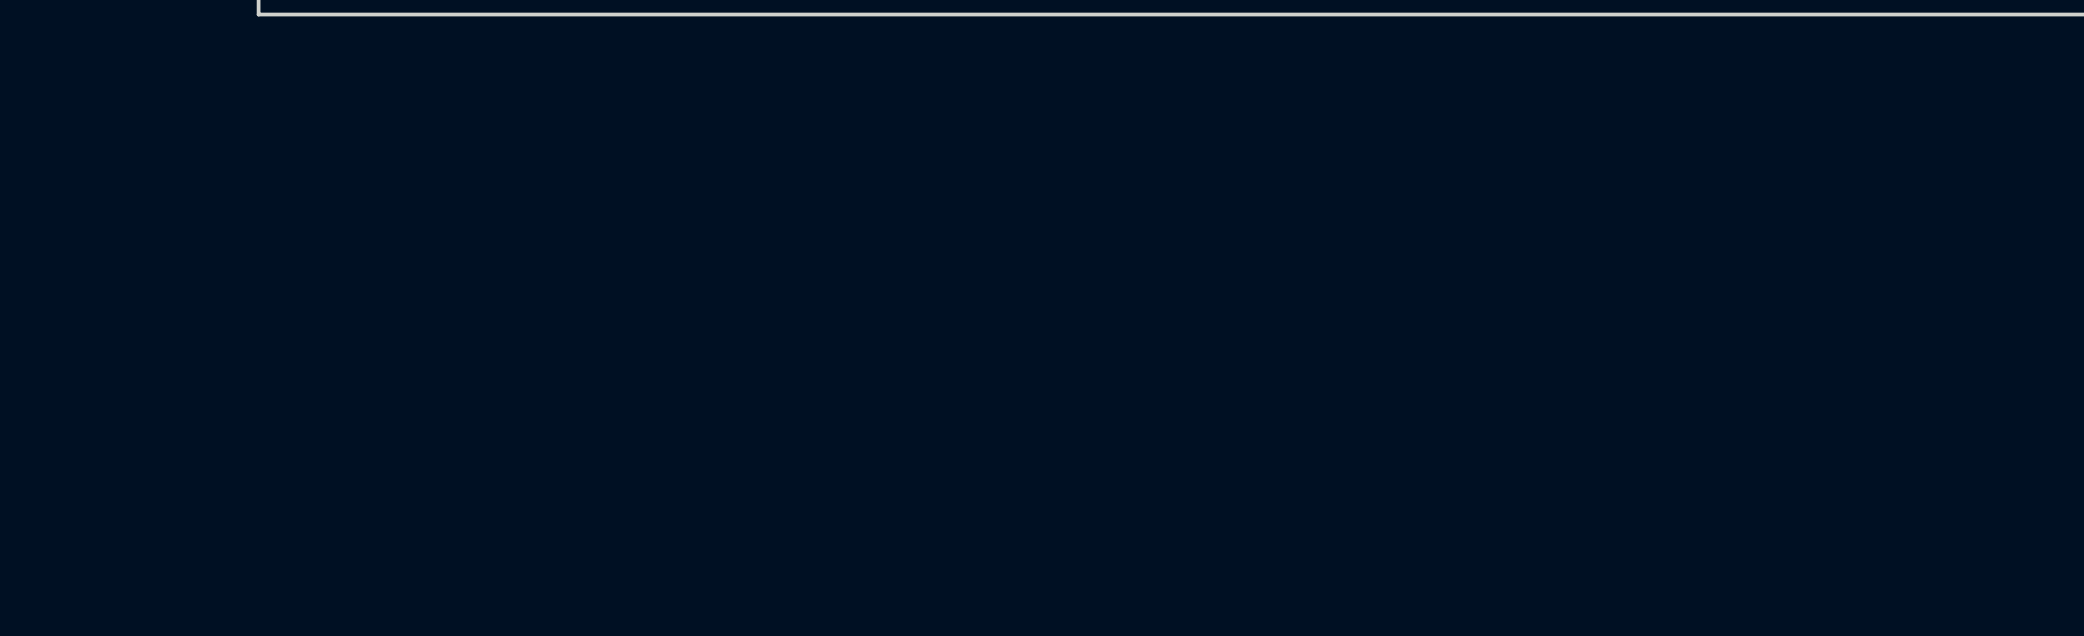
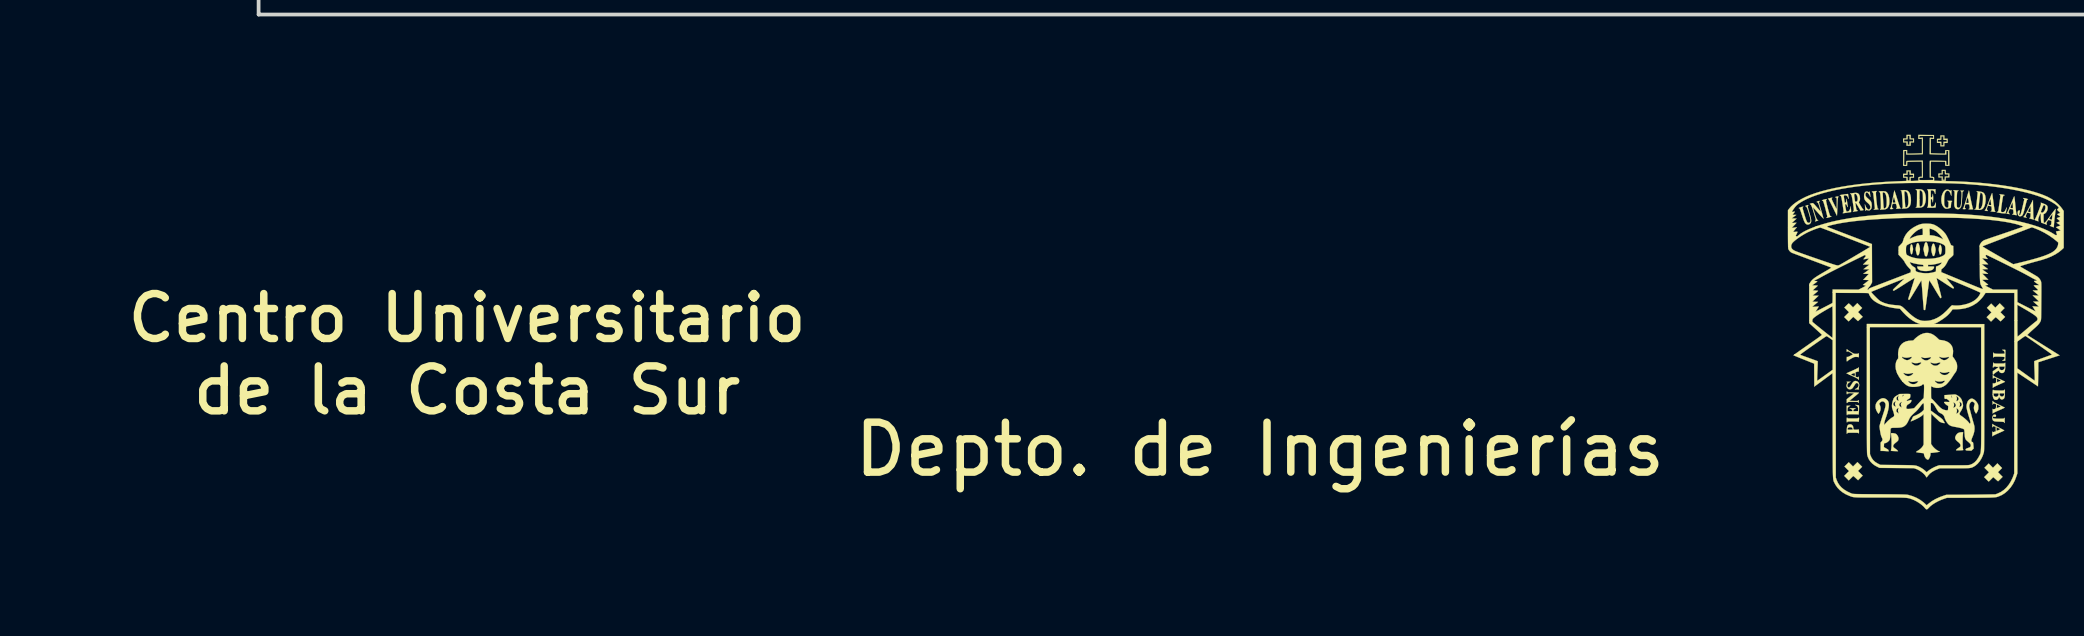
drawing: none -> [1787, 134, 2064, 510]
text: none -> Centro Universitario (467, 316)
text: none -> de la Costa Sur (469, 388)
text: none -> Depto. de Ingenierías (1261, 454)

